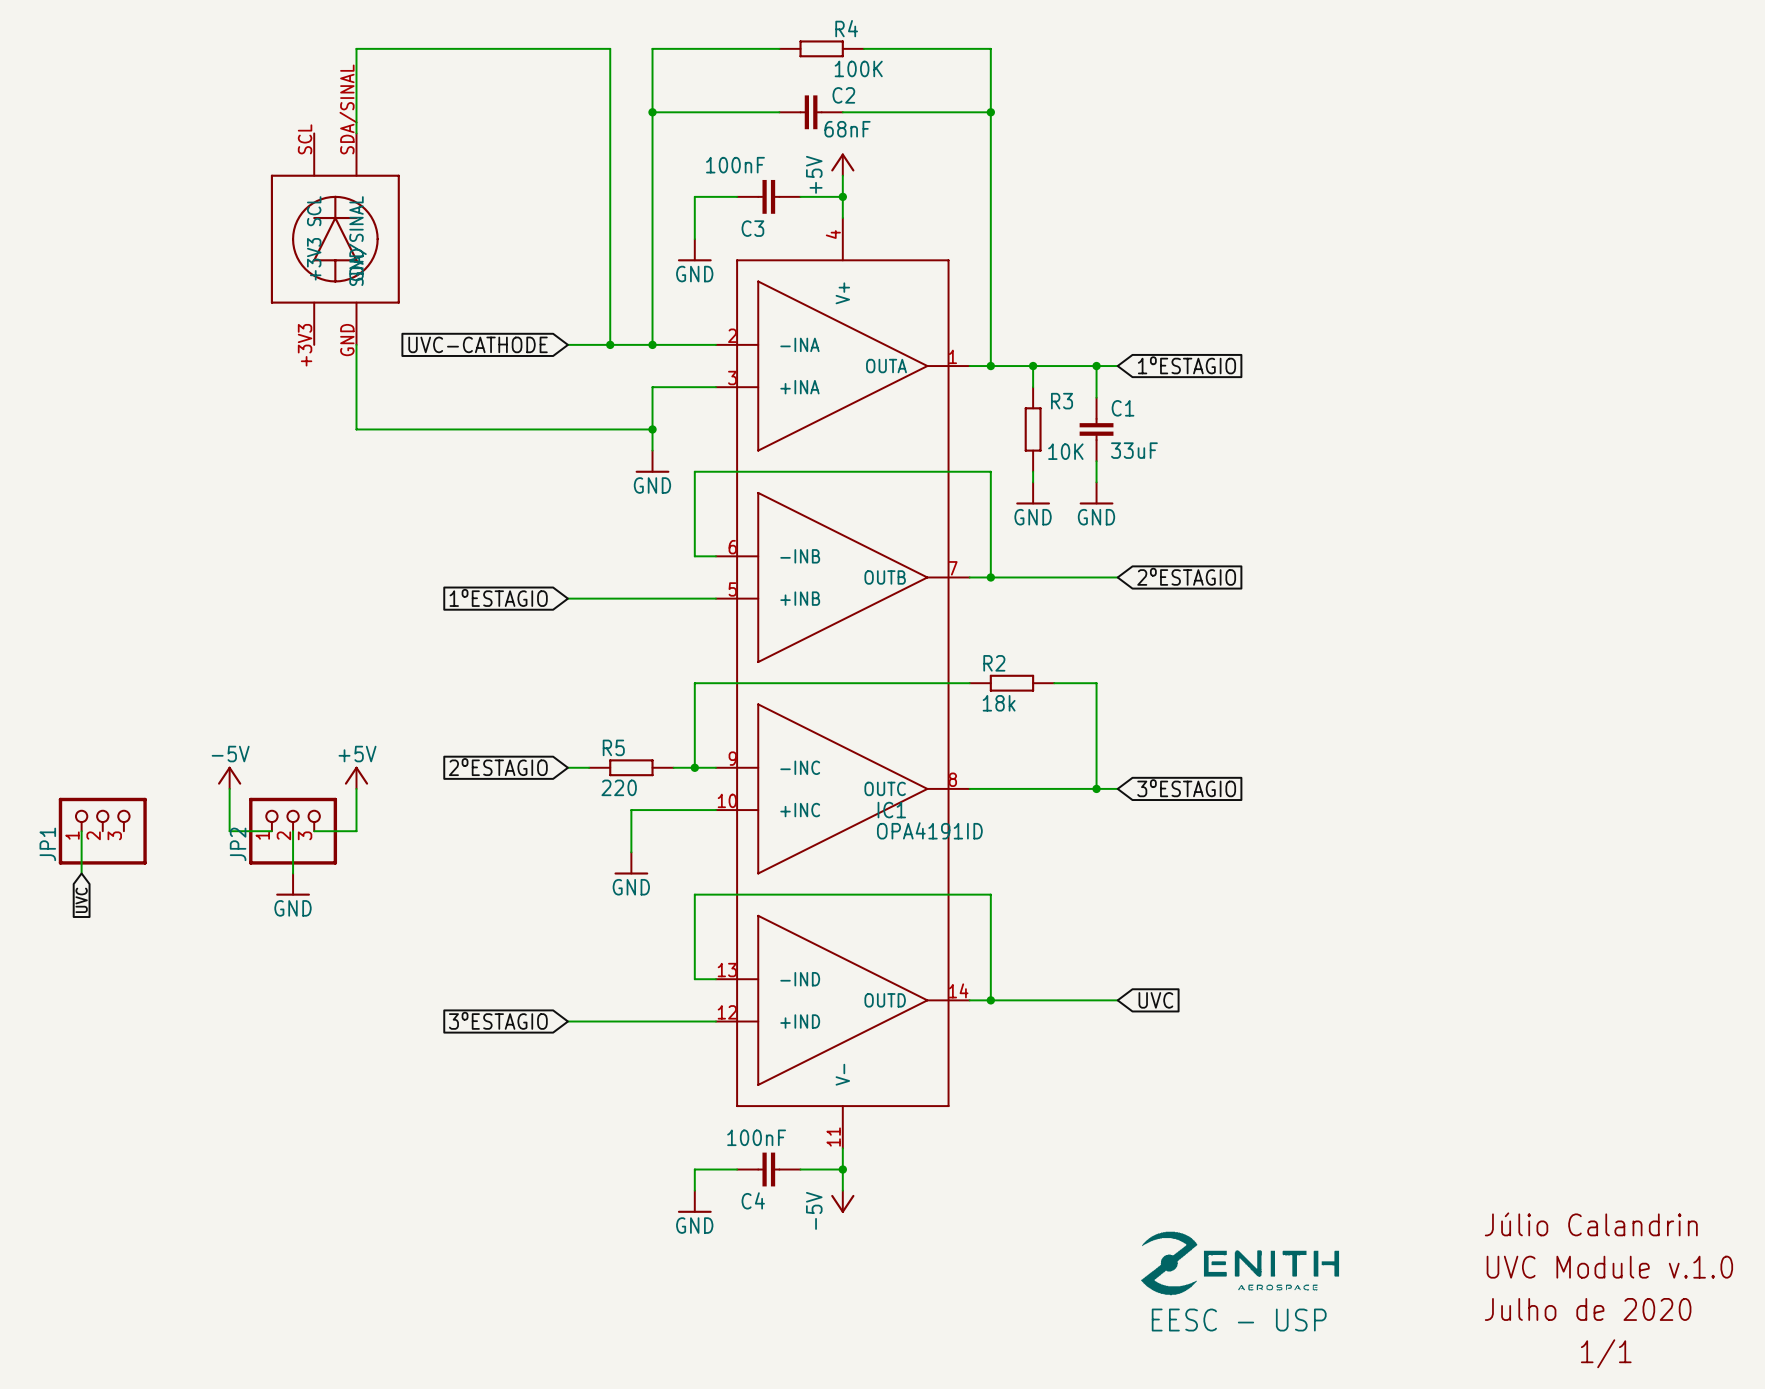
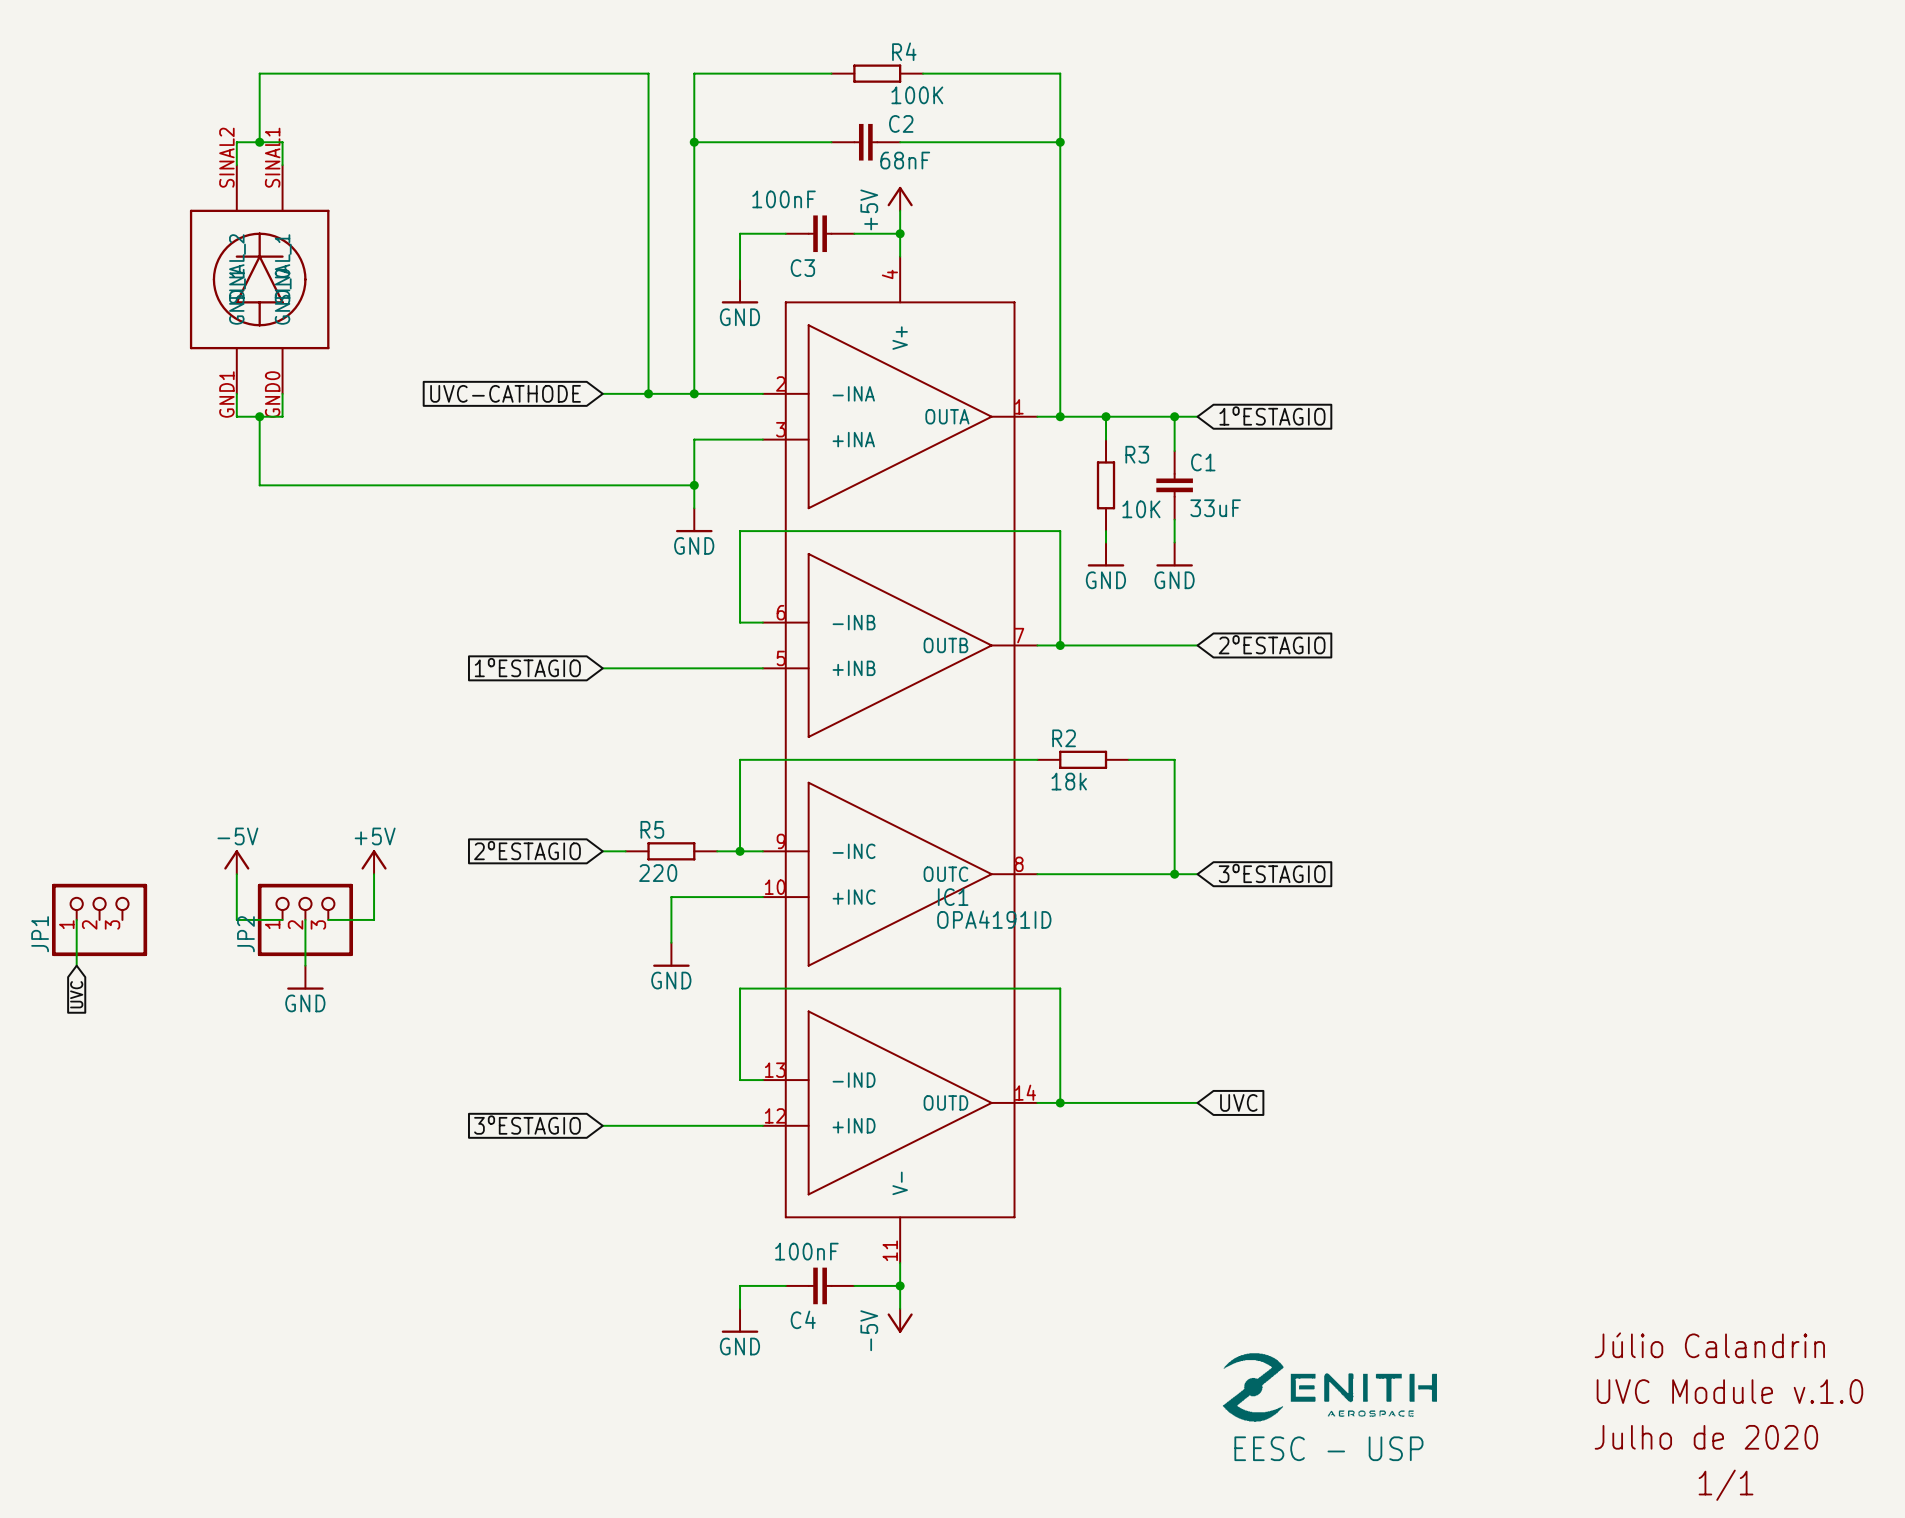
wire: (356, 48) (356, 133) -> (374, 73) (259, 73) (259, 142)
junction: none -> (259, 142)
wire: none -> (236, 165) (236, 142) (282, 142) (282, 165)
part: none -> (259, 279)
part: (335, 239) -> none
wire: none -> (236, 393) (236, 416) (282, 416) (282, 393)
wire: (356, 344) (356, 429) -> (259, 416) (259, 485) (374, 485)
junction: none -> (259, 416)

